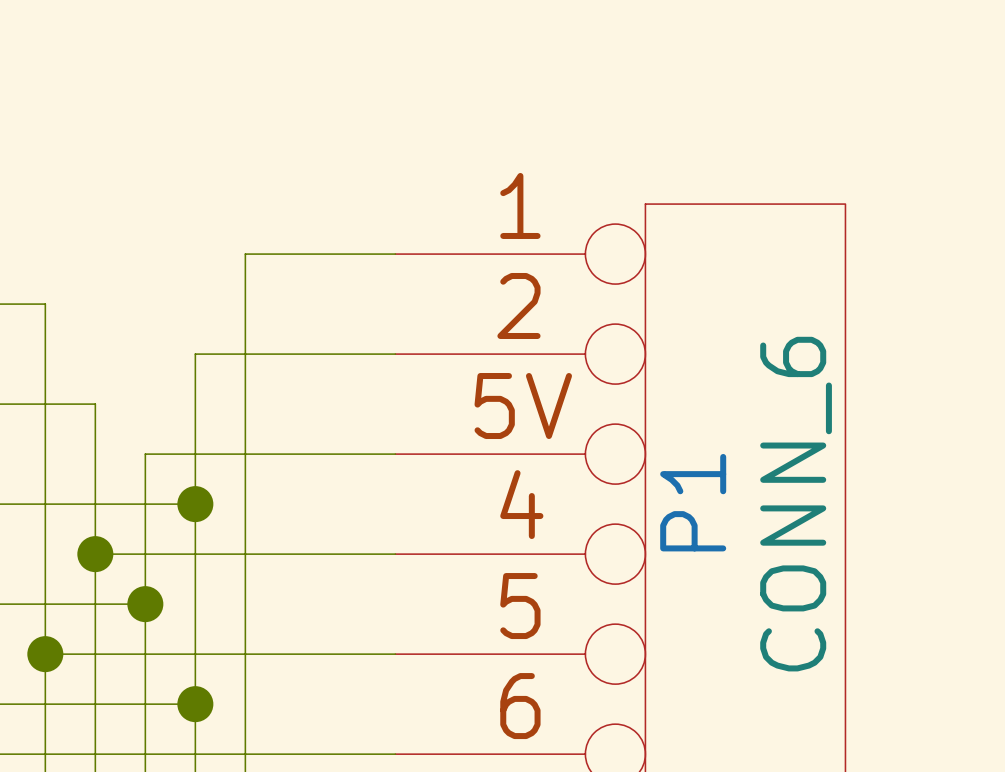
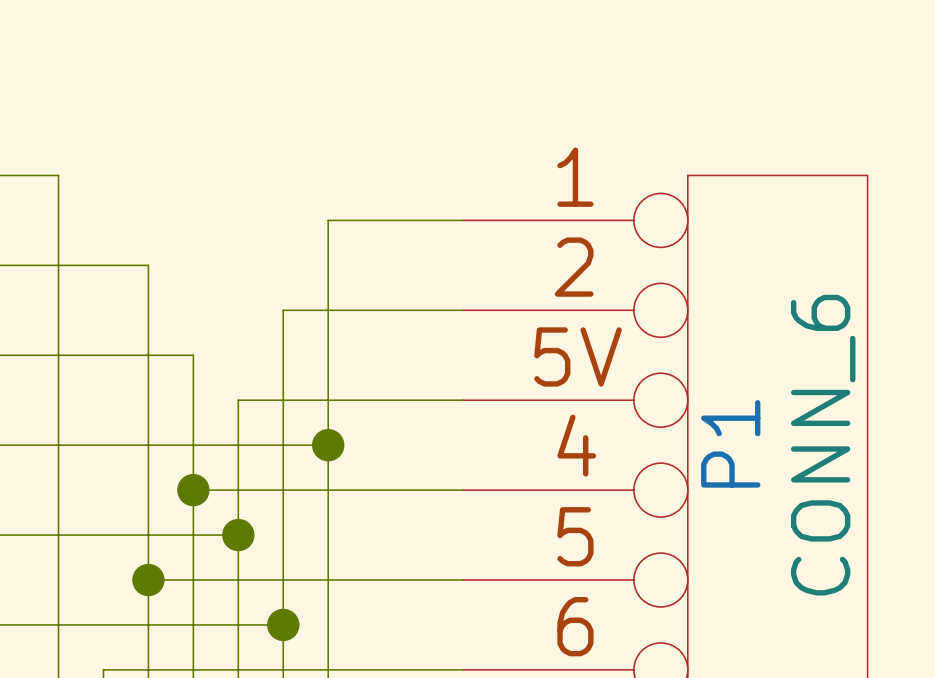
wire: none -> (283, 445) (328, 445)
junction position: (195, 504) -> (328, 445)

